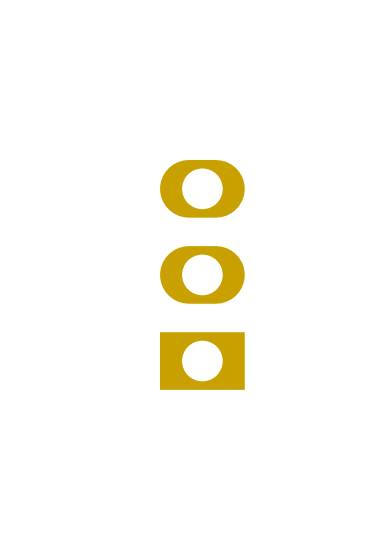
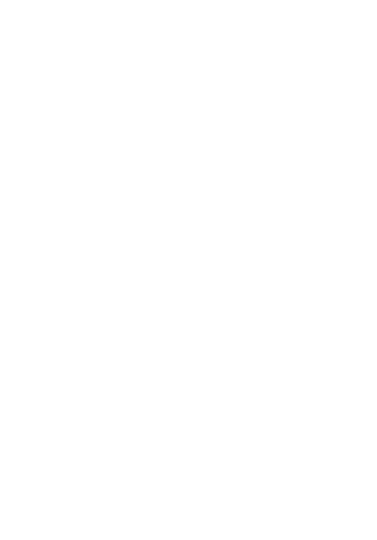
part: (202, 274) -> none

